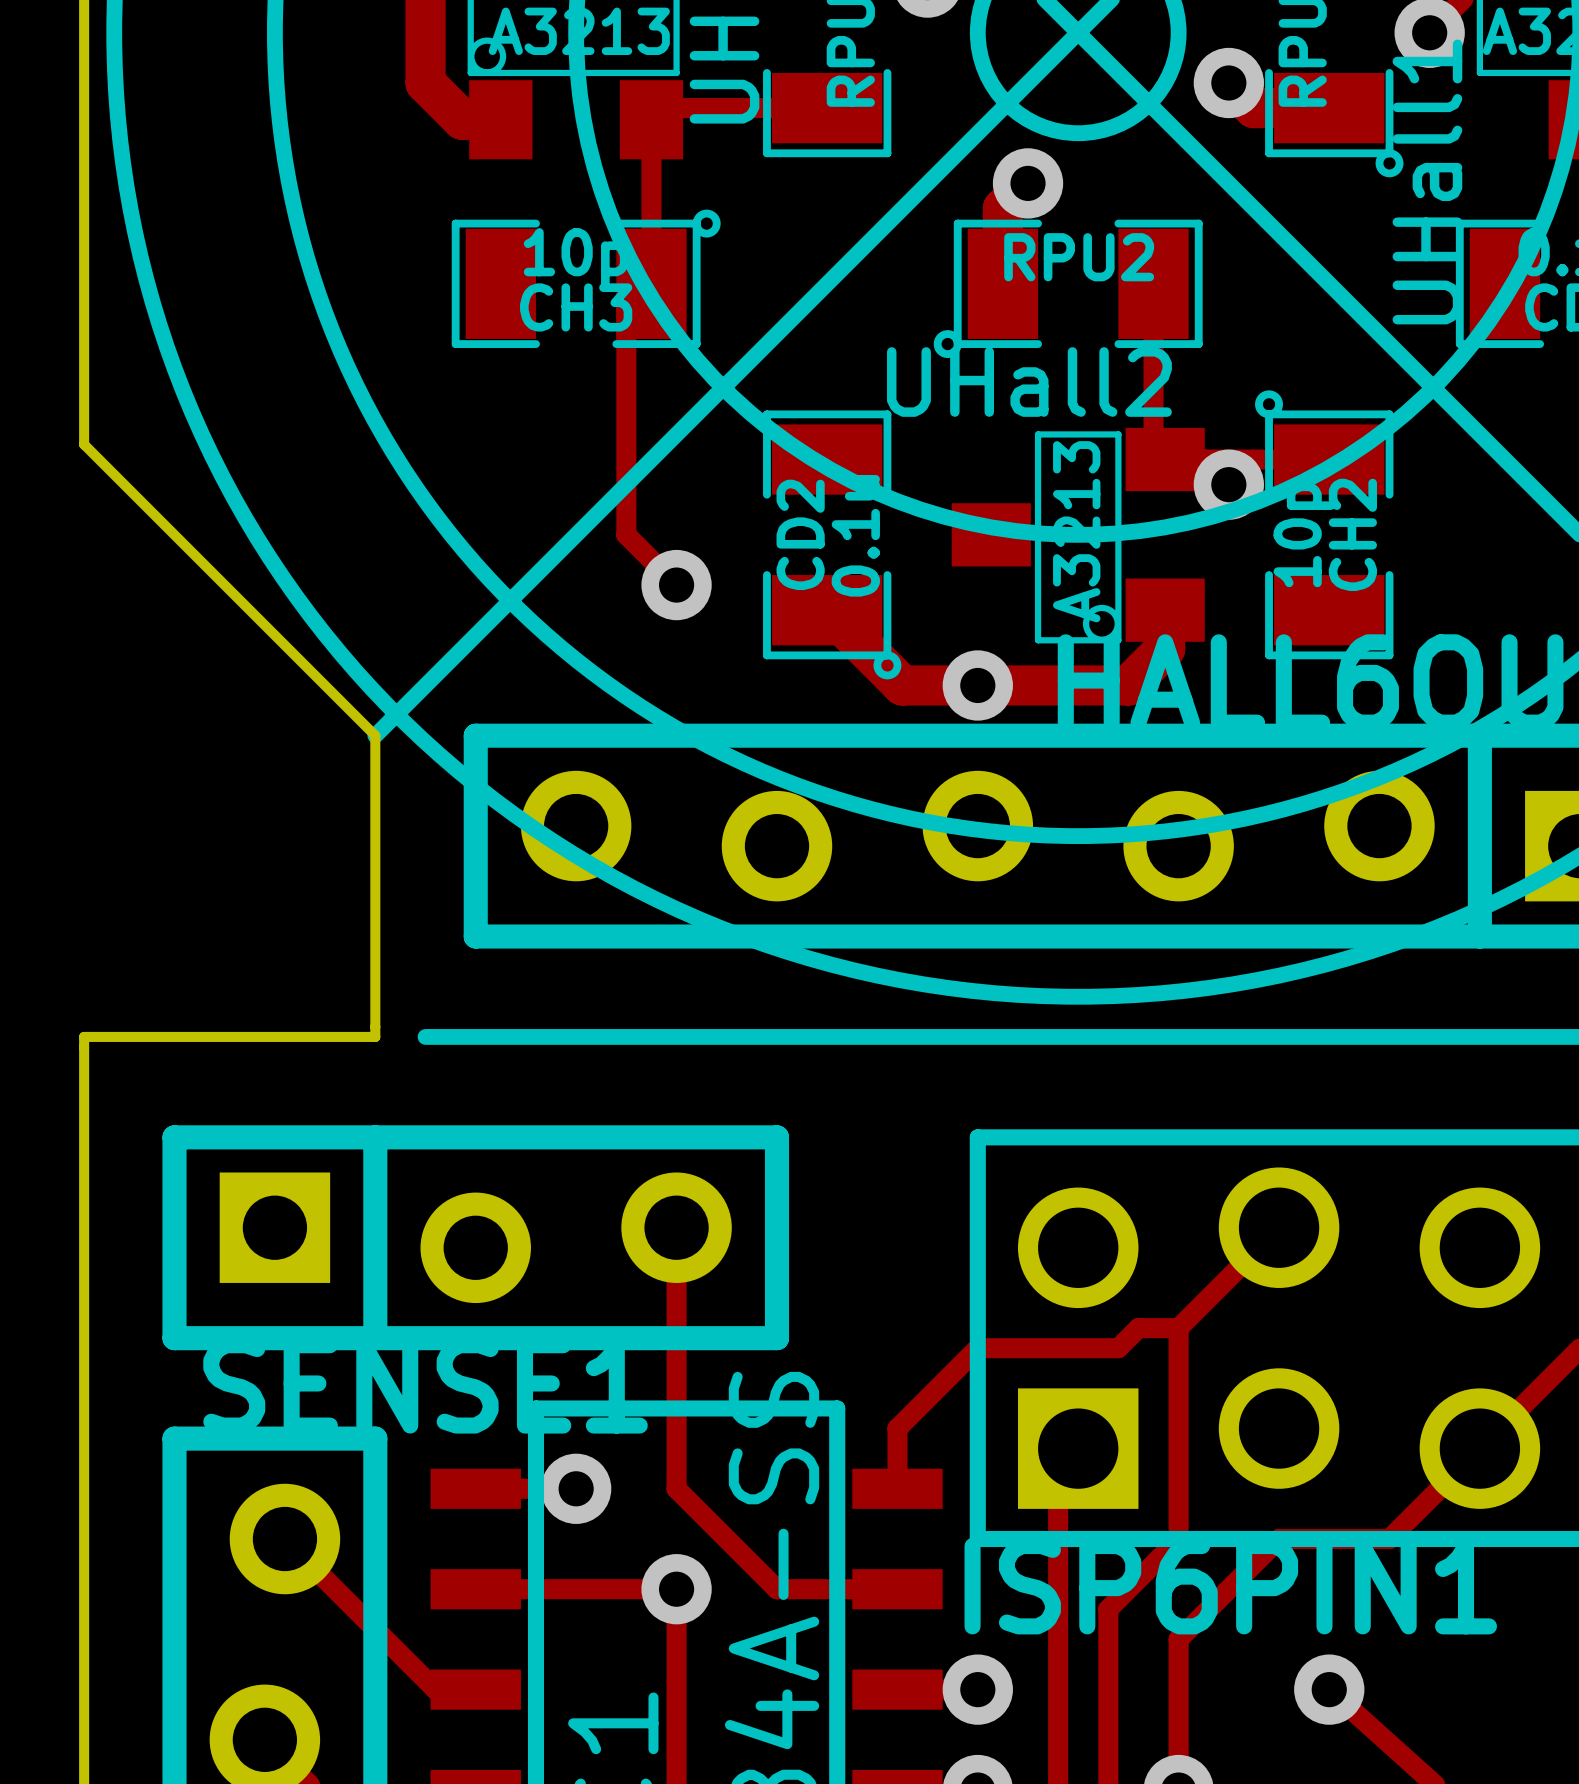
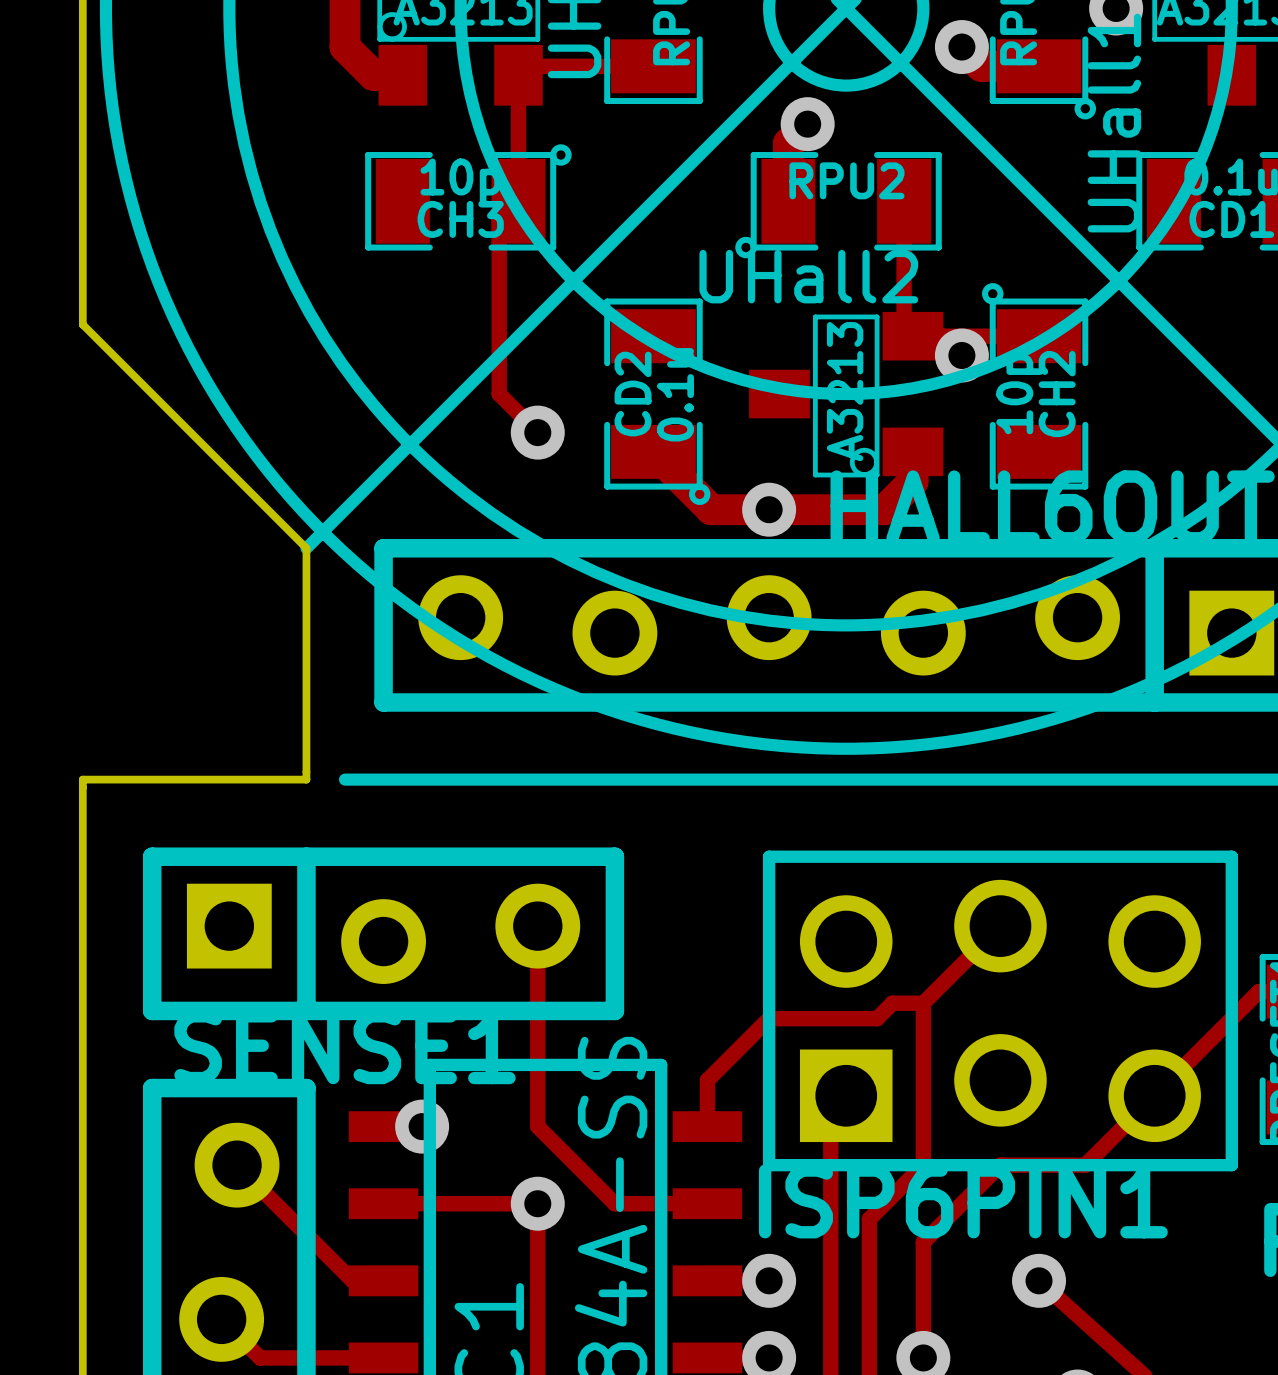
via position: (576, 1488) -> (422, 1126)

